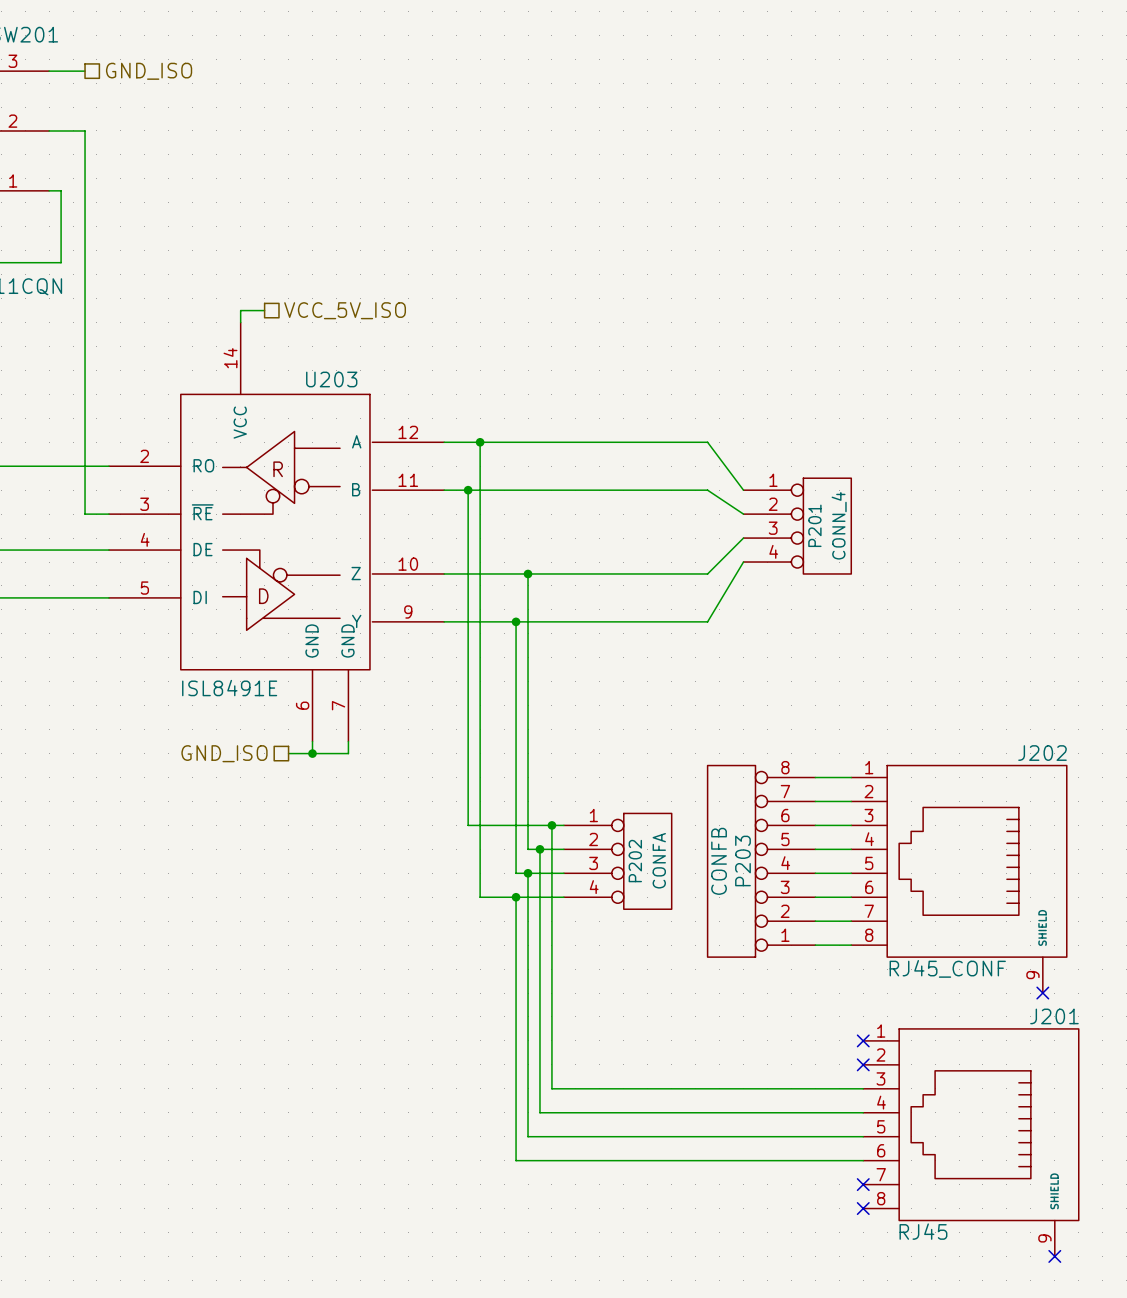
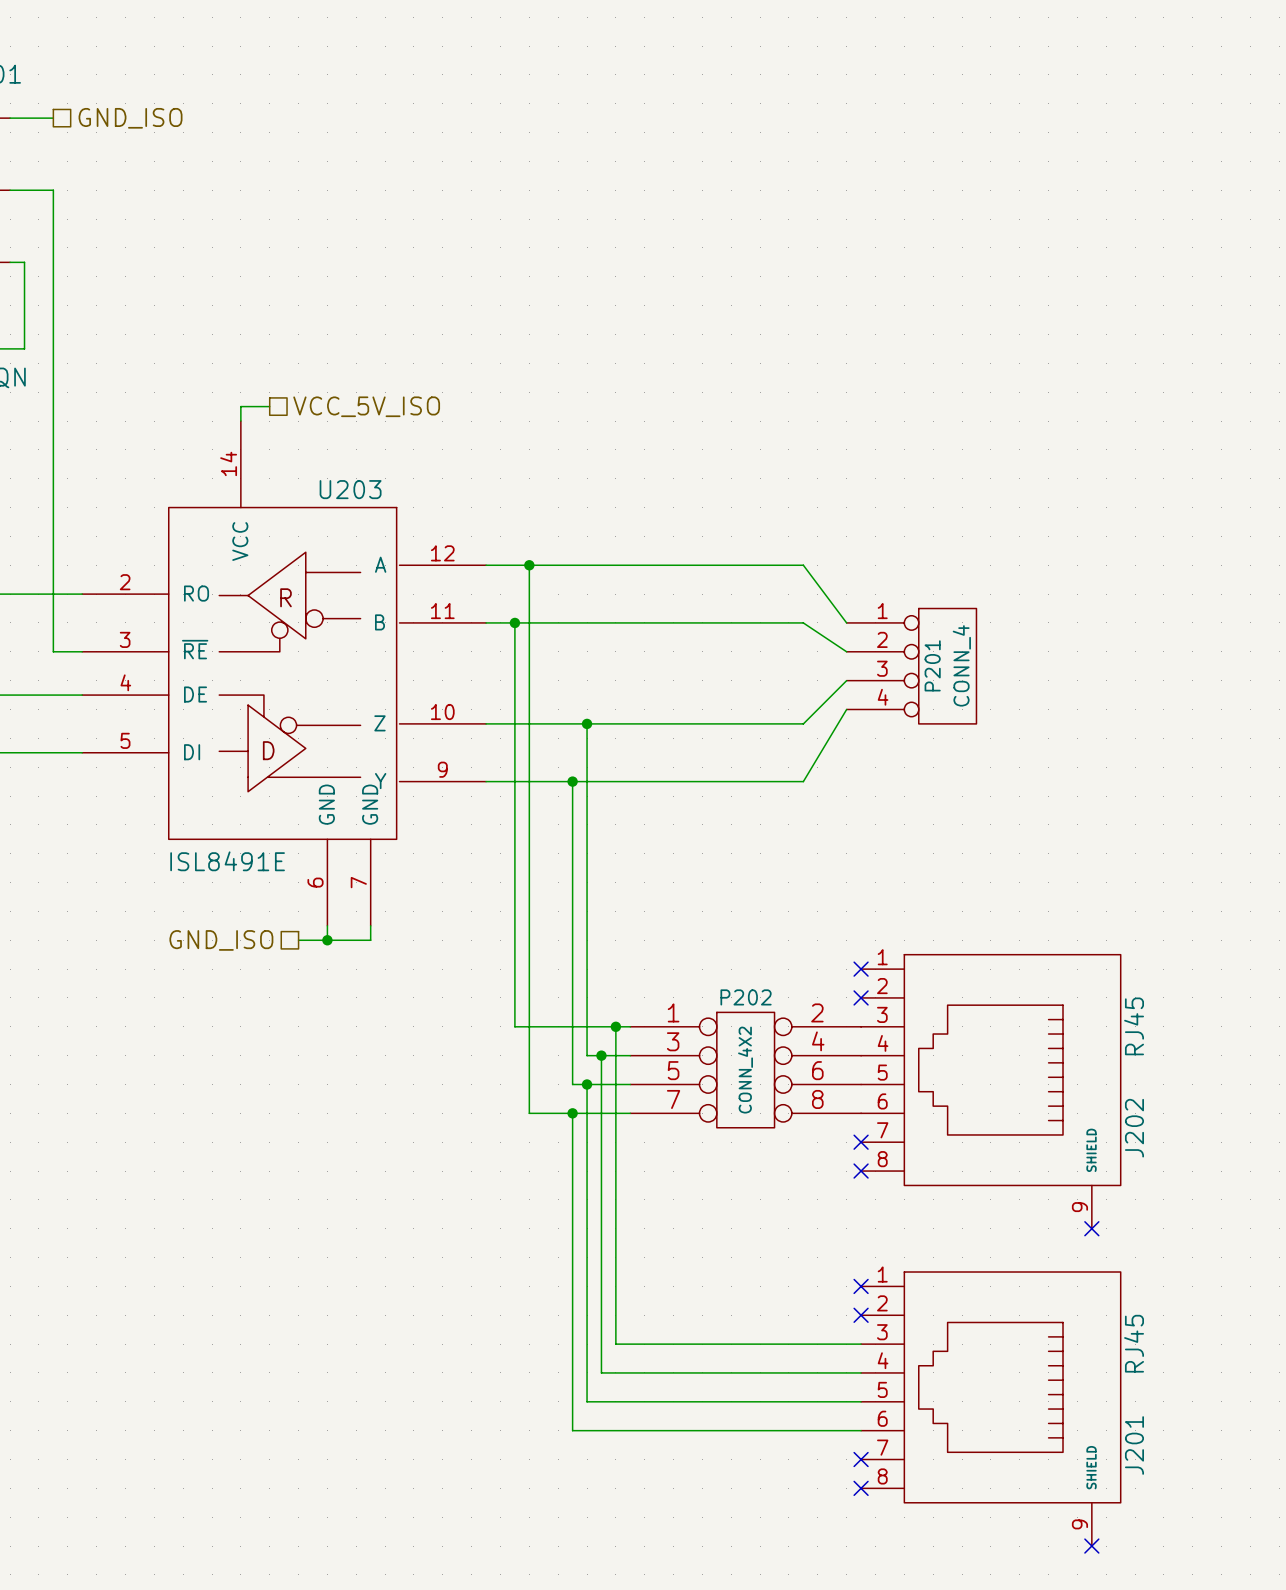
J202 name rotation: 0° (1042, 753) -> 90° counterclockwise (1134, 1128)
J202 name position: J202 (1042, 753) -> J202 (1134, 1128)
no-connect mark: none -> (861, 969)
wire: (815, 777) (851, 777) -> none
no-connect mark: none -> (861, 997)
wire: (815, 801) (851, 801) -> none
P202 symbol: [563, 813, 672, 910] -> [630, 1012, 862, 1128]
wire: (815, 825) (851, 825) -> none
wire: (815, 849) (851, 849) -> none
P202 value: CONFA (659, 860) -> CONN_4X2 (745, 1070)
P202 name position: P202 (635, 861) -> P202 (746, 997)
P203: CONFB (761, 861) -> none
wire: (815, 873) (851, 873) -> none
J202 position: (959, 879) -> (990, 1091)
wire: (815, 897) (851, 897) -> none
no-connect mark: none -> (861, 1142)
wire: (815, 921) (851, 921) -> none
no-connect mark: none -> (861, 1171)
wire: (815, 945) (851, 945) -> none
J202 value: RJ45_CONF (947, 968) -> RJ45 (1134, 1026)
no-connect mark: none -> (1091, 1228)
no-connect mark: (1042, 993) -> none
J201 name rotation: 0° (1054, 1016) -> 90° counterclockwise (1134, 1445)
J201 name position: J201 (1054, 1016) -> J201 (1134, 1445)
no-connect mark: none -> (861, 1286)
no-connect mark: (863, 1040) -> none
no-connect mark: none -> (861, 1315)
no-connect mark: (863, 1064) -> none
wire: (755, 1088) (863, 1088) -> none
wire: (755, 1112) (863, 1112) -> none
wire: (755, 1136) (863, 1136) -> none
J201 position: (971, 1142) -> (990, 1409)
wire: (755, 1160) (863, 1160) -> none
no-connect mark: none -> (861, 1459)
no-connect mark: (863, 1184) -> none
no-connect mark: none -> (861, 1488)
no-connect mark: (863, 1208) -> none
J201 value rotation: 0° (923, 1231) -> 90° counterclockwise (1134, 1343)
J201 value position: RJ45 (923, 1231) -> RJ45 (1134, 1343)
no-connect mark: none -> (1091, 1546)
no-connect mark: (1054, 1256) -> none

